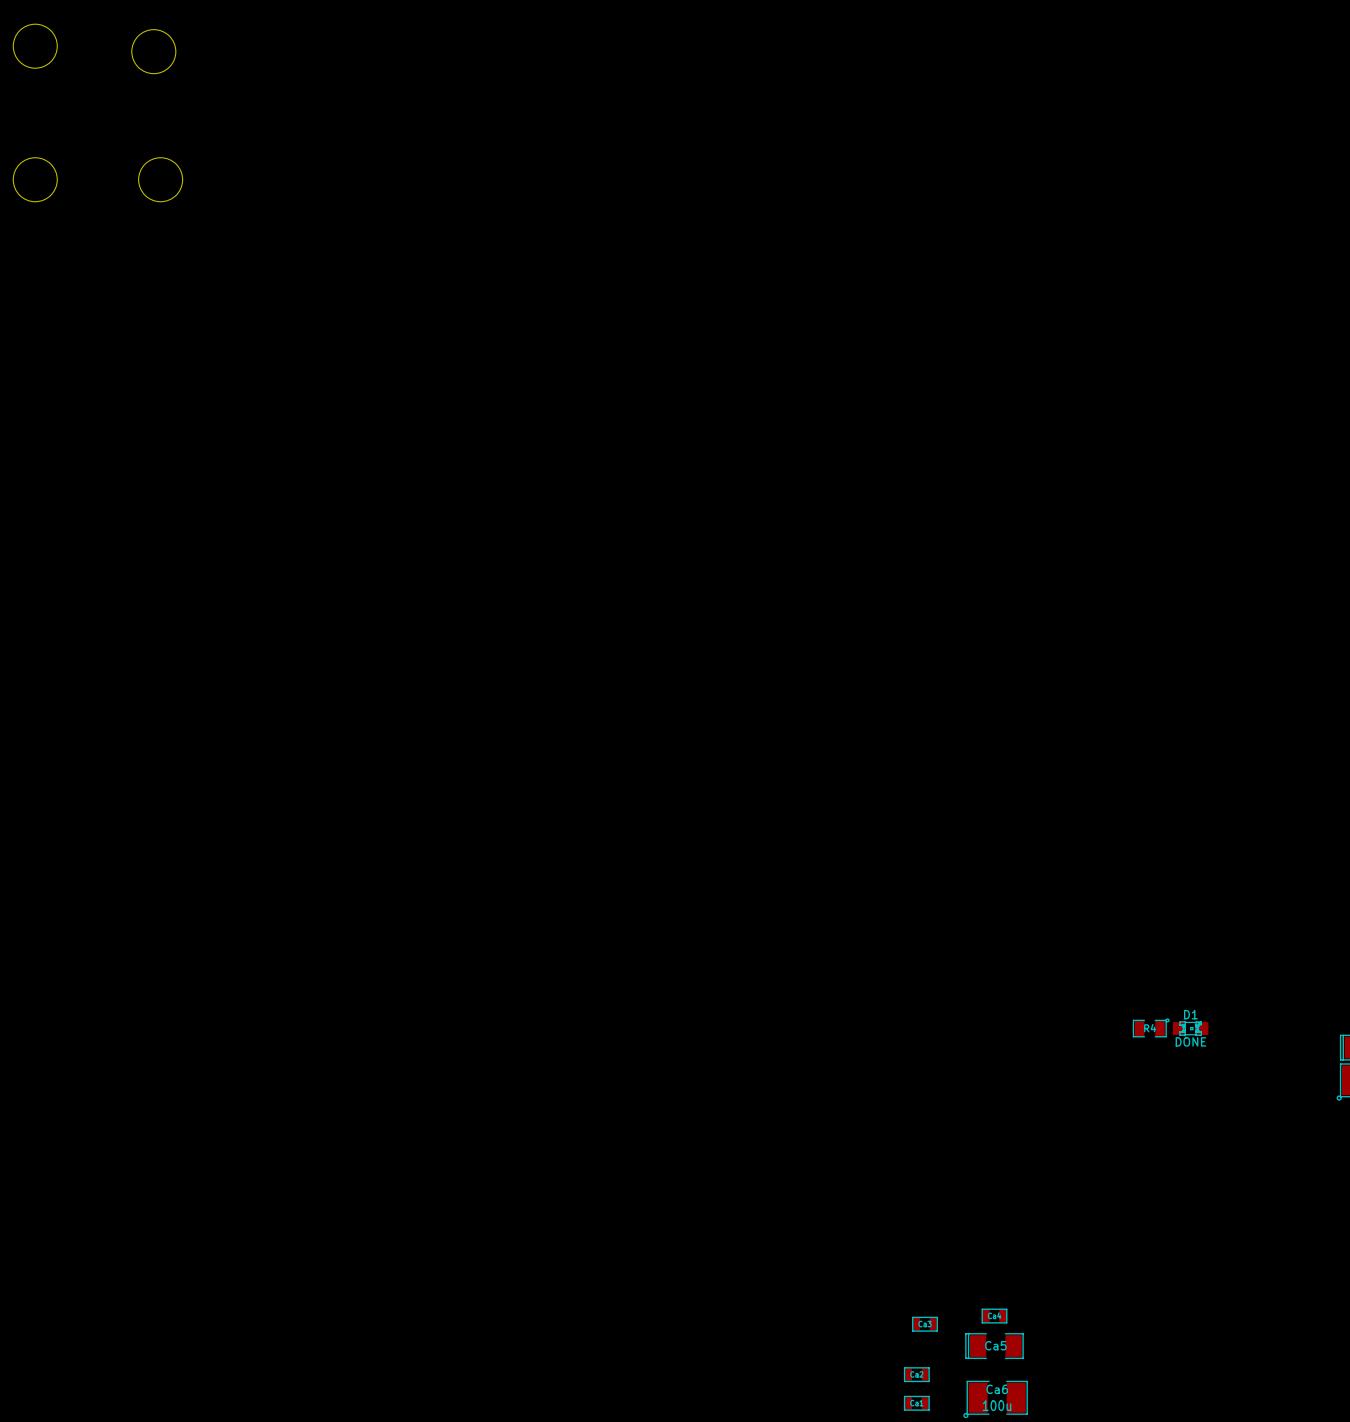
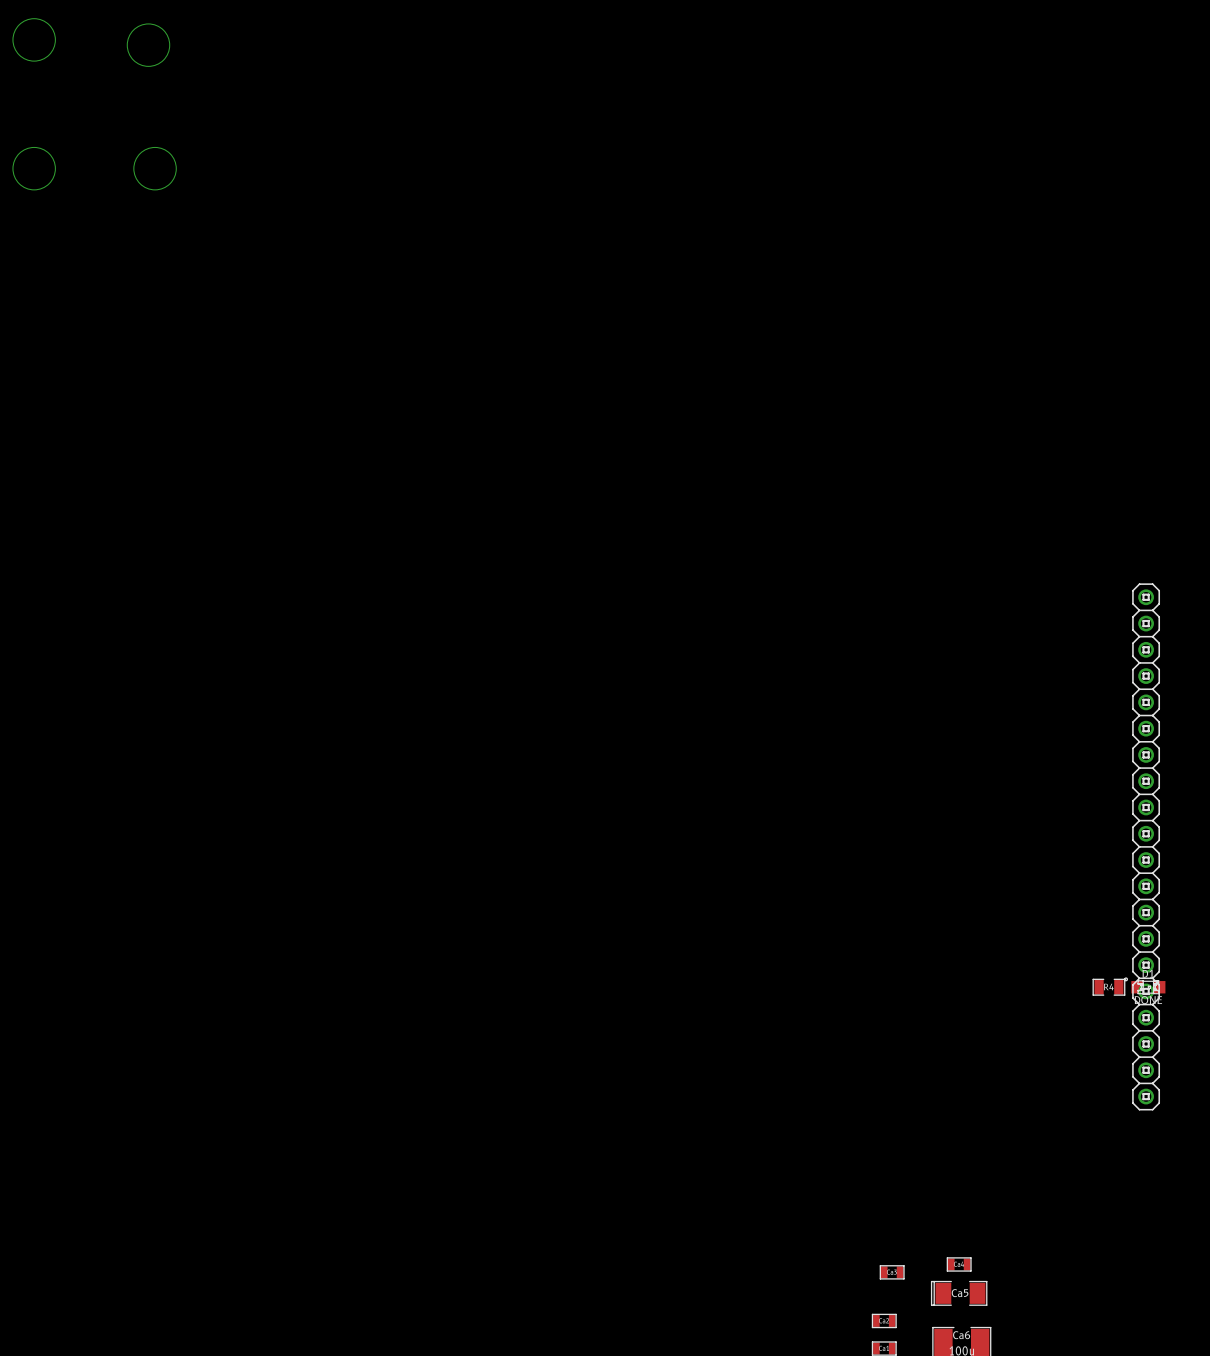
part: none -> (1146, 846)

